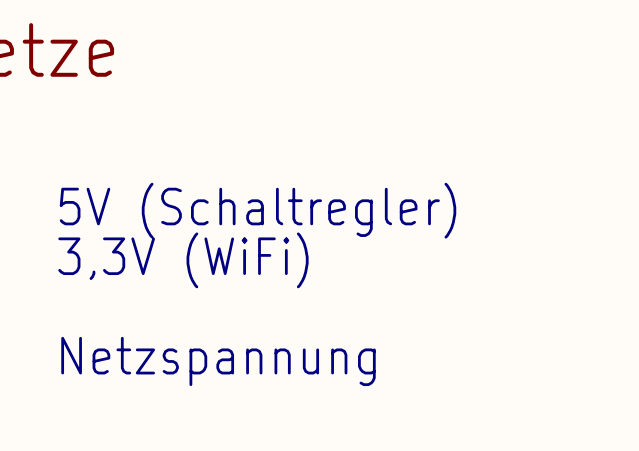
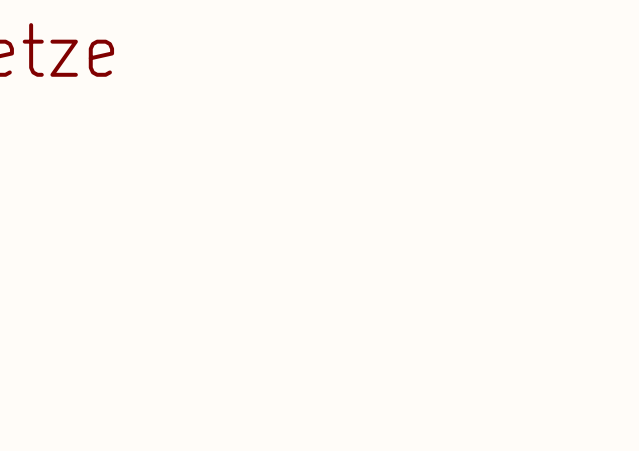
text: 5V (Schaltregler) (258, 210) -> none
text: 3,3V (WiFi) (183, 260) -> none
text: Netzspannung (218, 361) -> none

